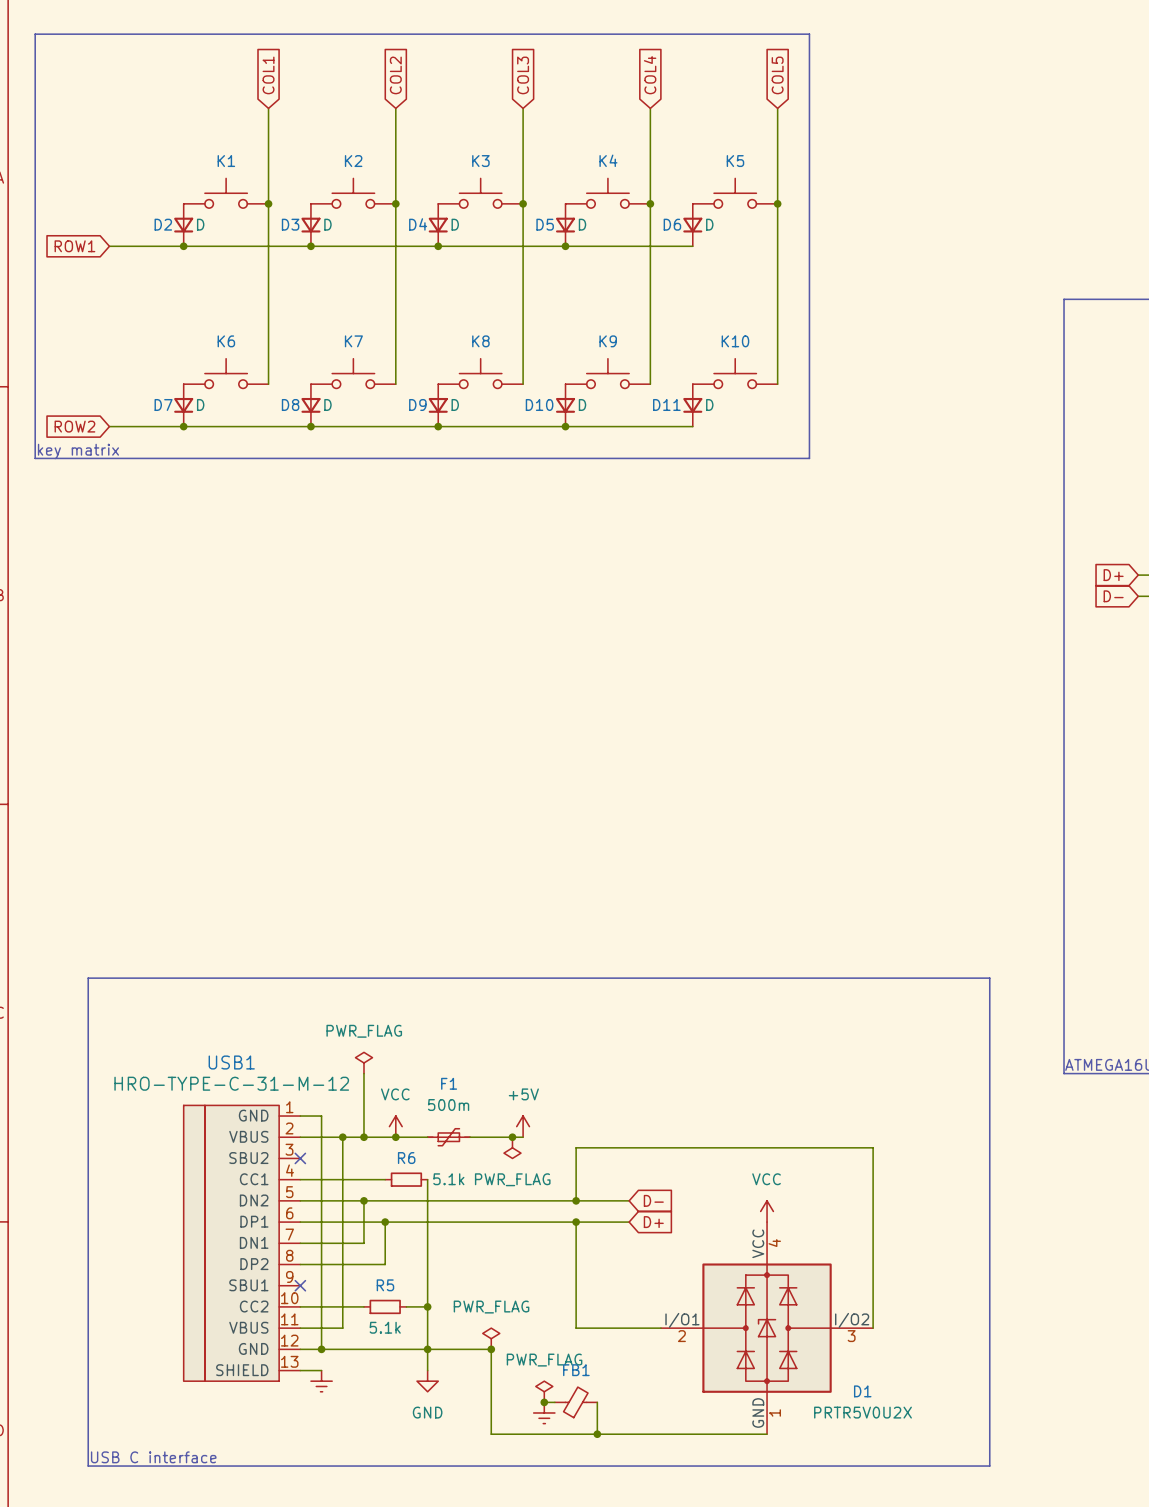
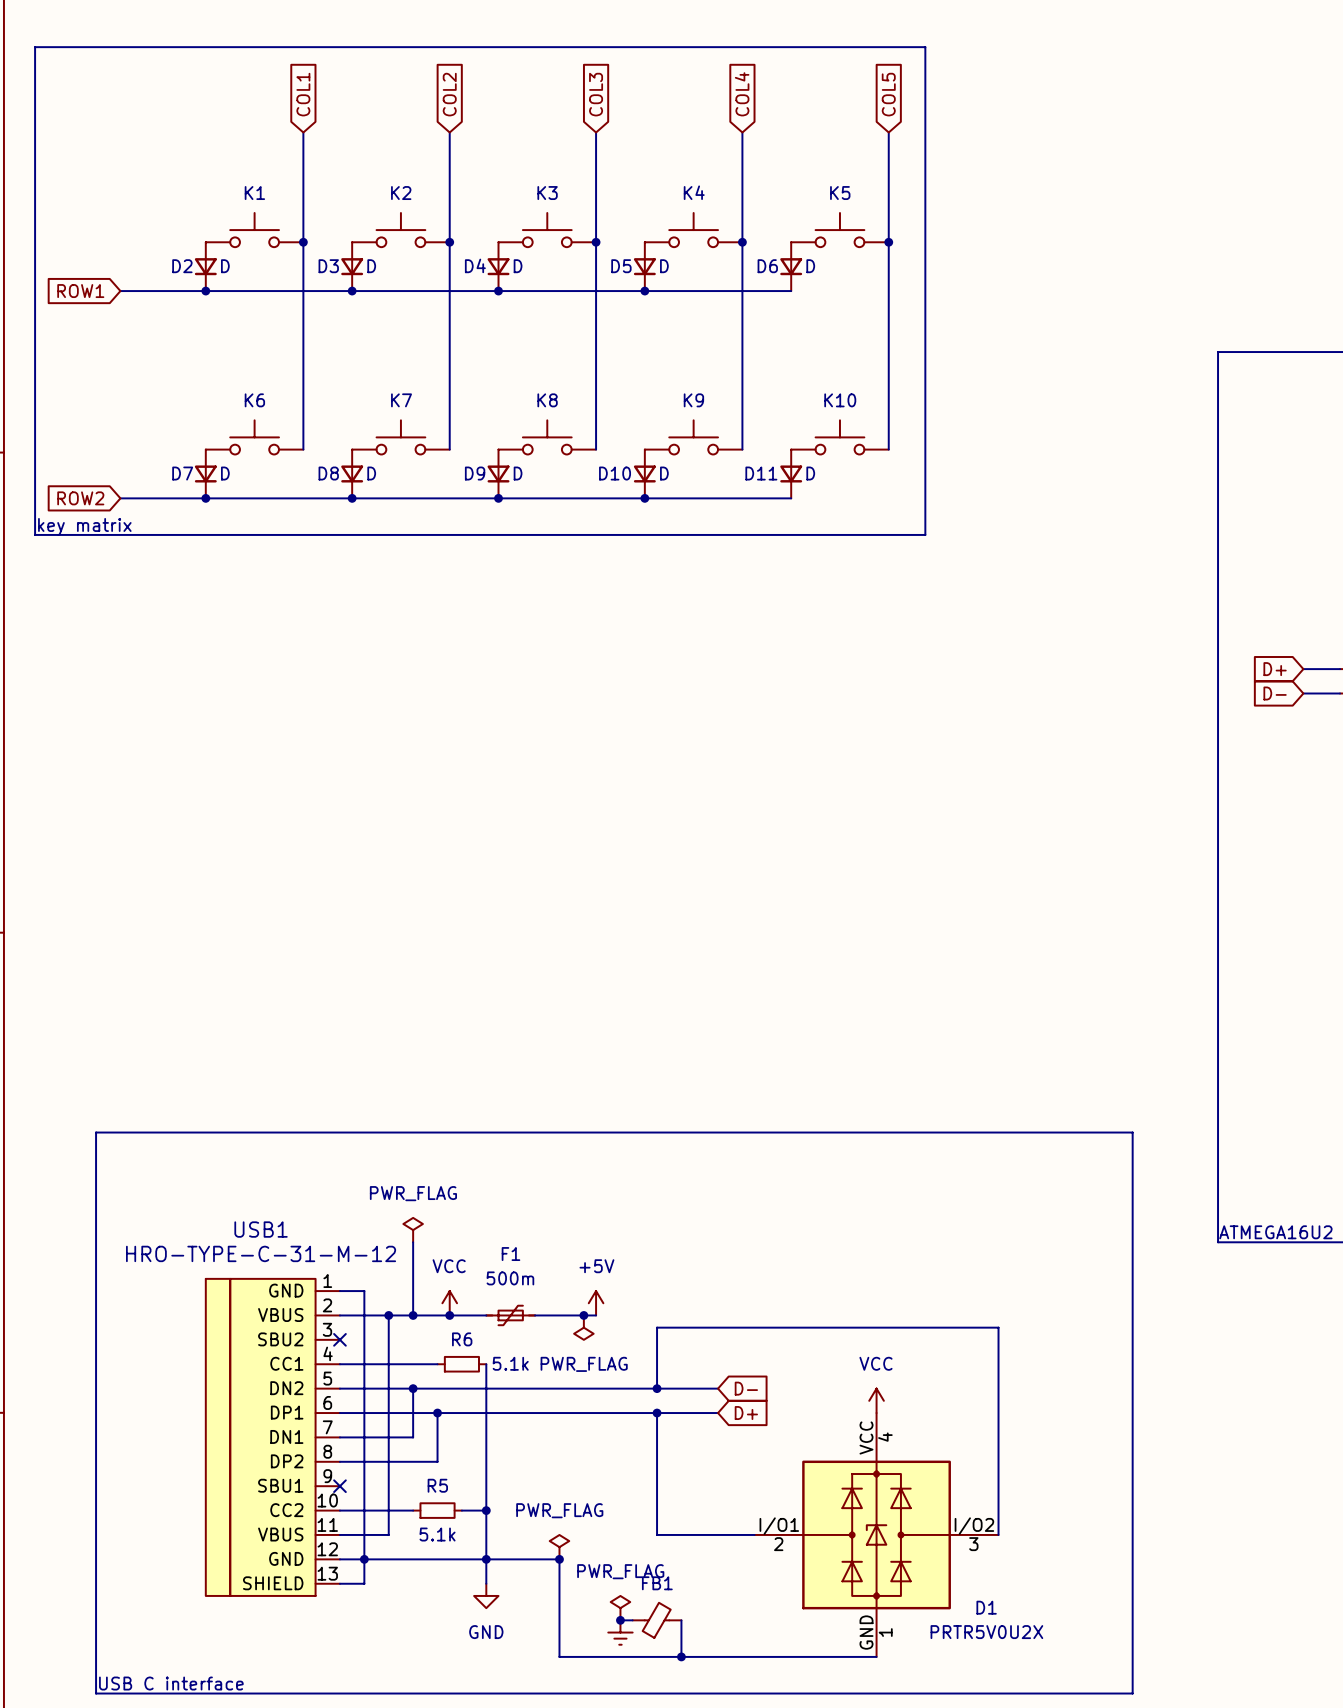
wire: none -> (364, 1559) (364, 1583)
power symbol: (321, 1381) -> none

